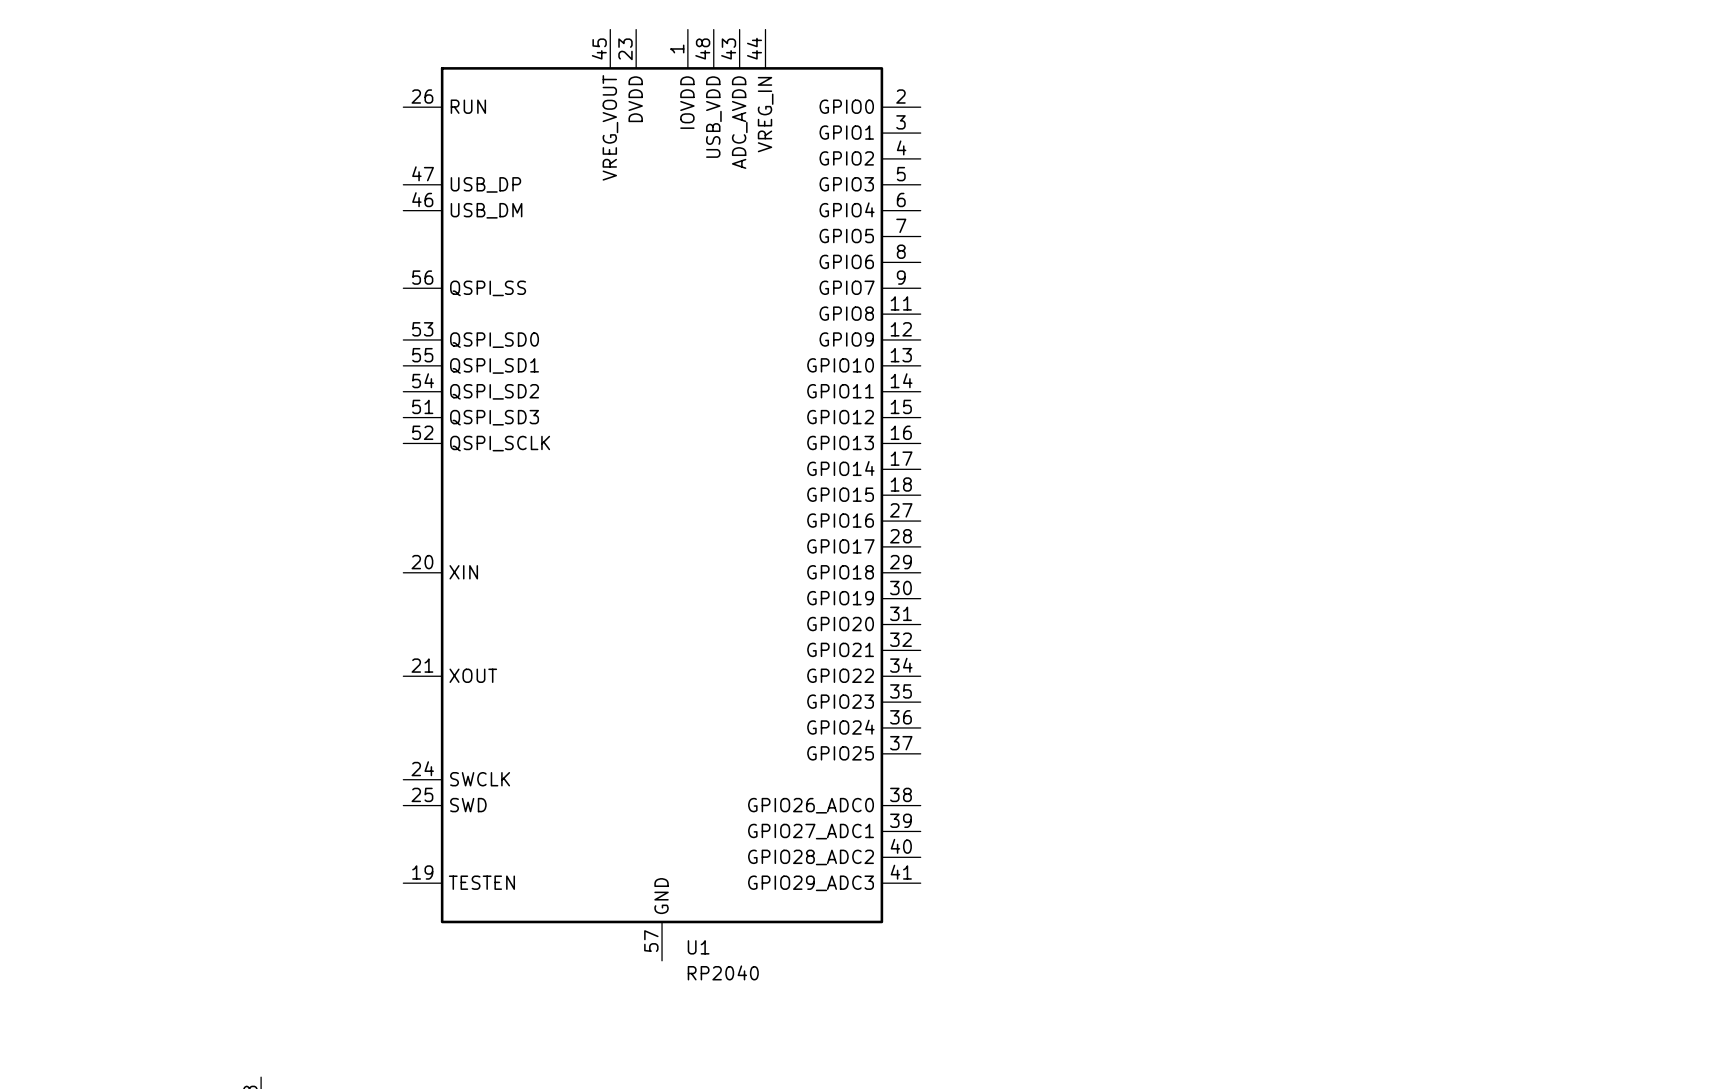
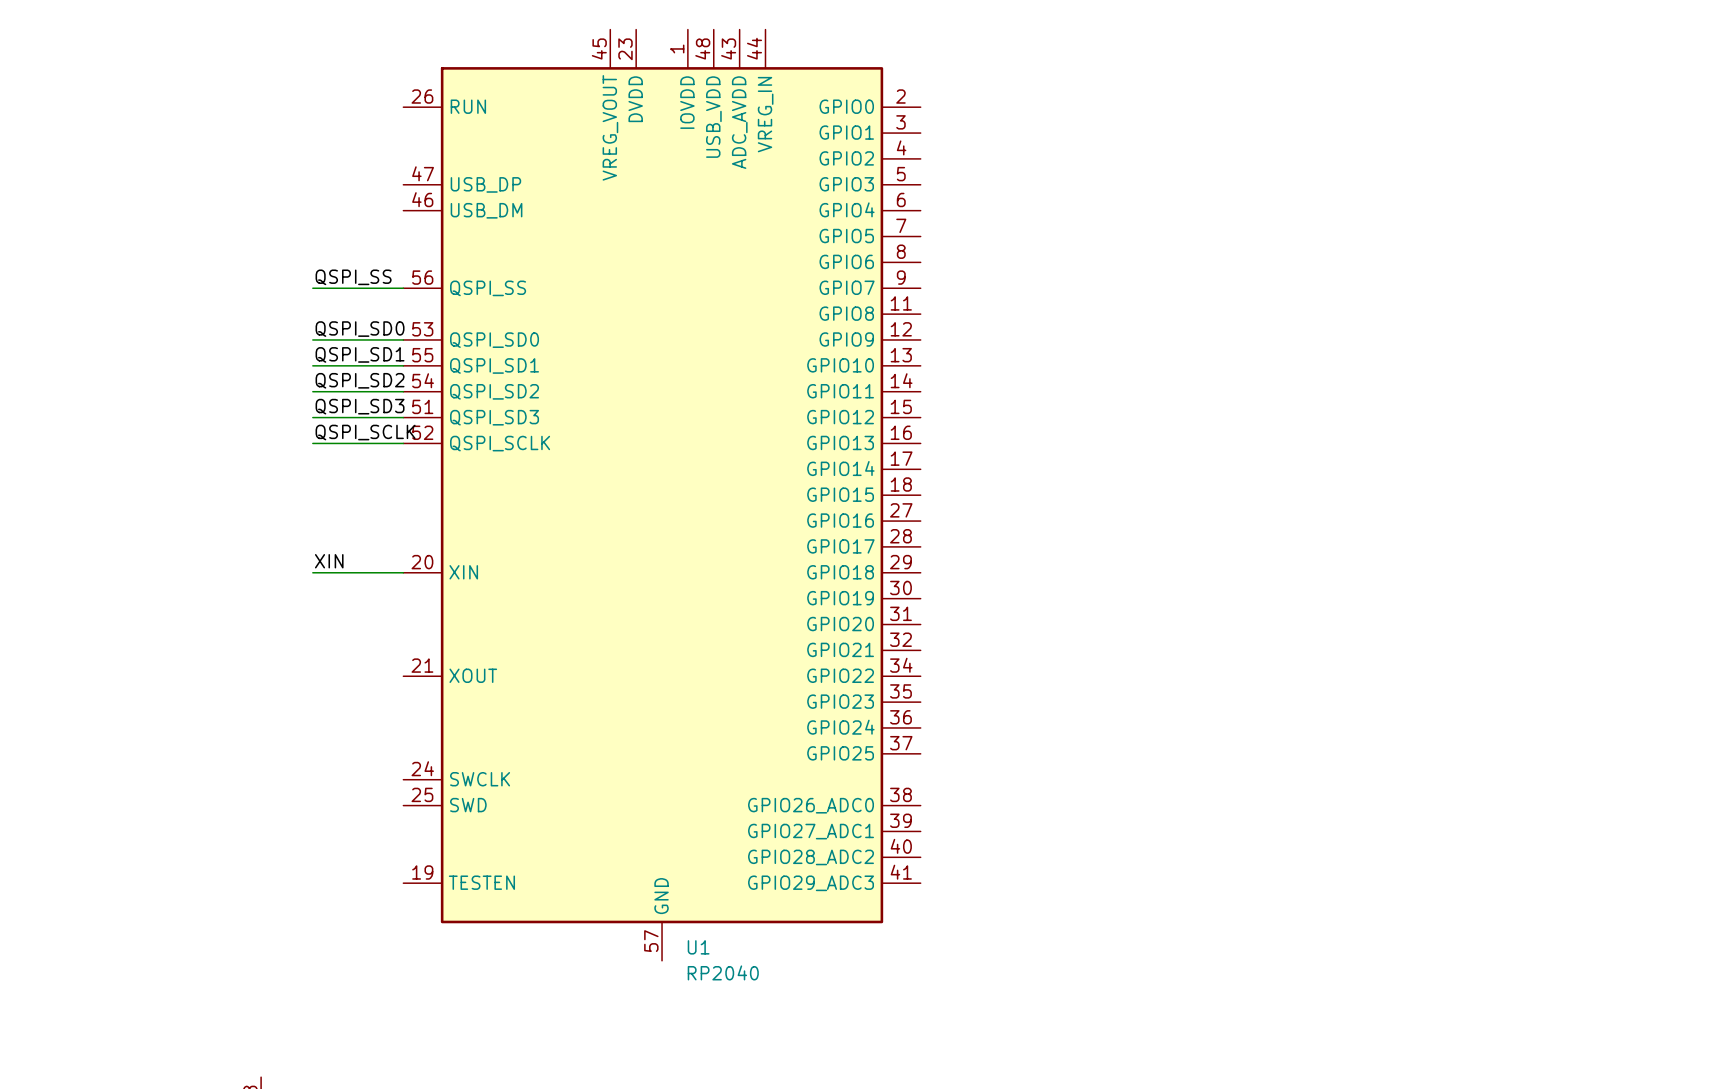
label: none -> QSPI_SS (353, 277)
wire: none -> (312, 288) (403, 288)
label: none -> QSPI_SD0 (360, 329)
wire: none -> (312, 339) (403, 339)
label: none -> QSPI_SD1 (360, 354)
wire: none -> (312, 365) (403, 365)
label: none -> QSPI_SD2 (360, 380)
wire: none -> (312, 391) (403, 391)
label: none -> QSPI_SD3 (360, 406)
wire: none -> (312, 417) (403, 417)
label: none -> QSPI_SCLK (365, 432)
wire: none -> (312, 443) (403, 443)
label: none -> XIN (329, 561)
wire: none -> (312, 572) (403, 572)

